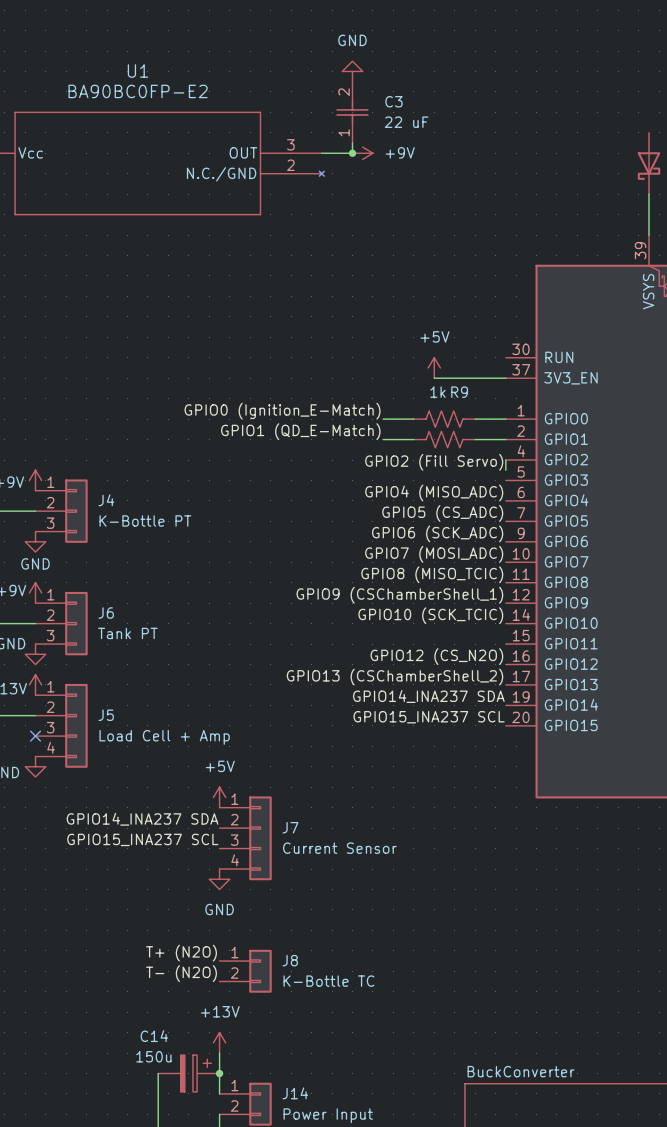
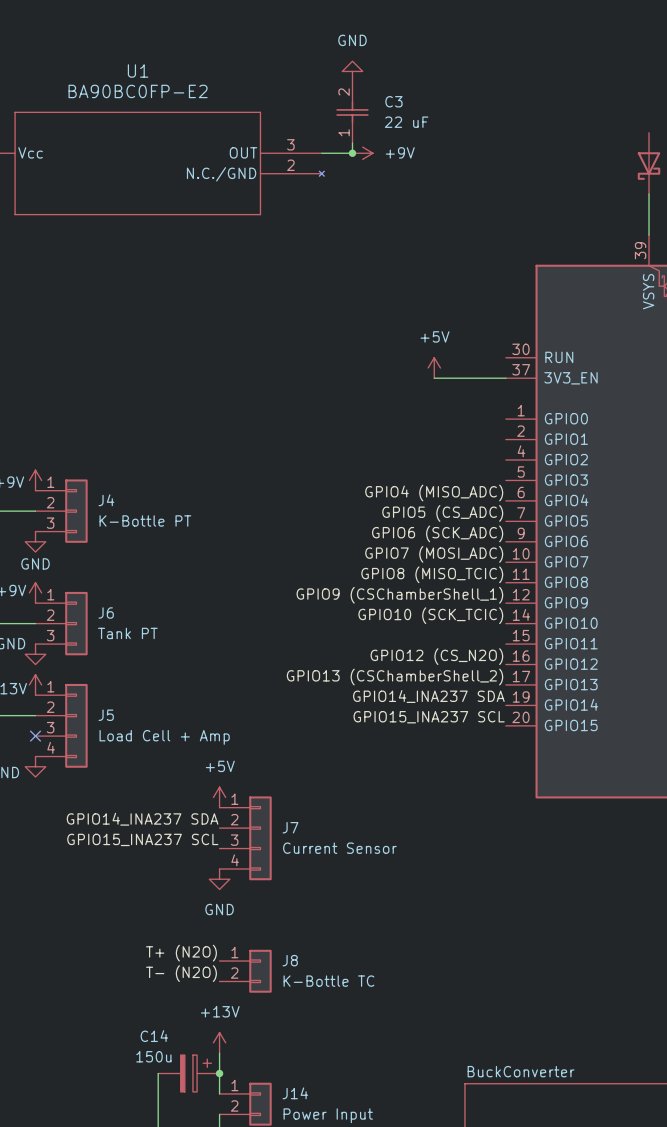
label: GPIO0 (Ignition_E-Match) (282, 411) -> none
wire: (383, 419) (413, 419) -> none
R9: 1k (444, 419) -> none
wire: (475, 419) (505, 419) -> none
label: GPIO1 (QD_E-Match) (300, 431) -> none
wire: (383, 439) (413, 439) -> none
part: (444, 439) -> none
wire: (475, 439) (505, 439) -> none
wire: (505, 460) (505, 470) -> none
label: GPIO2 (Fill Servo) (434, 462) -> none

